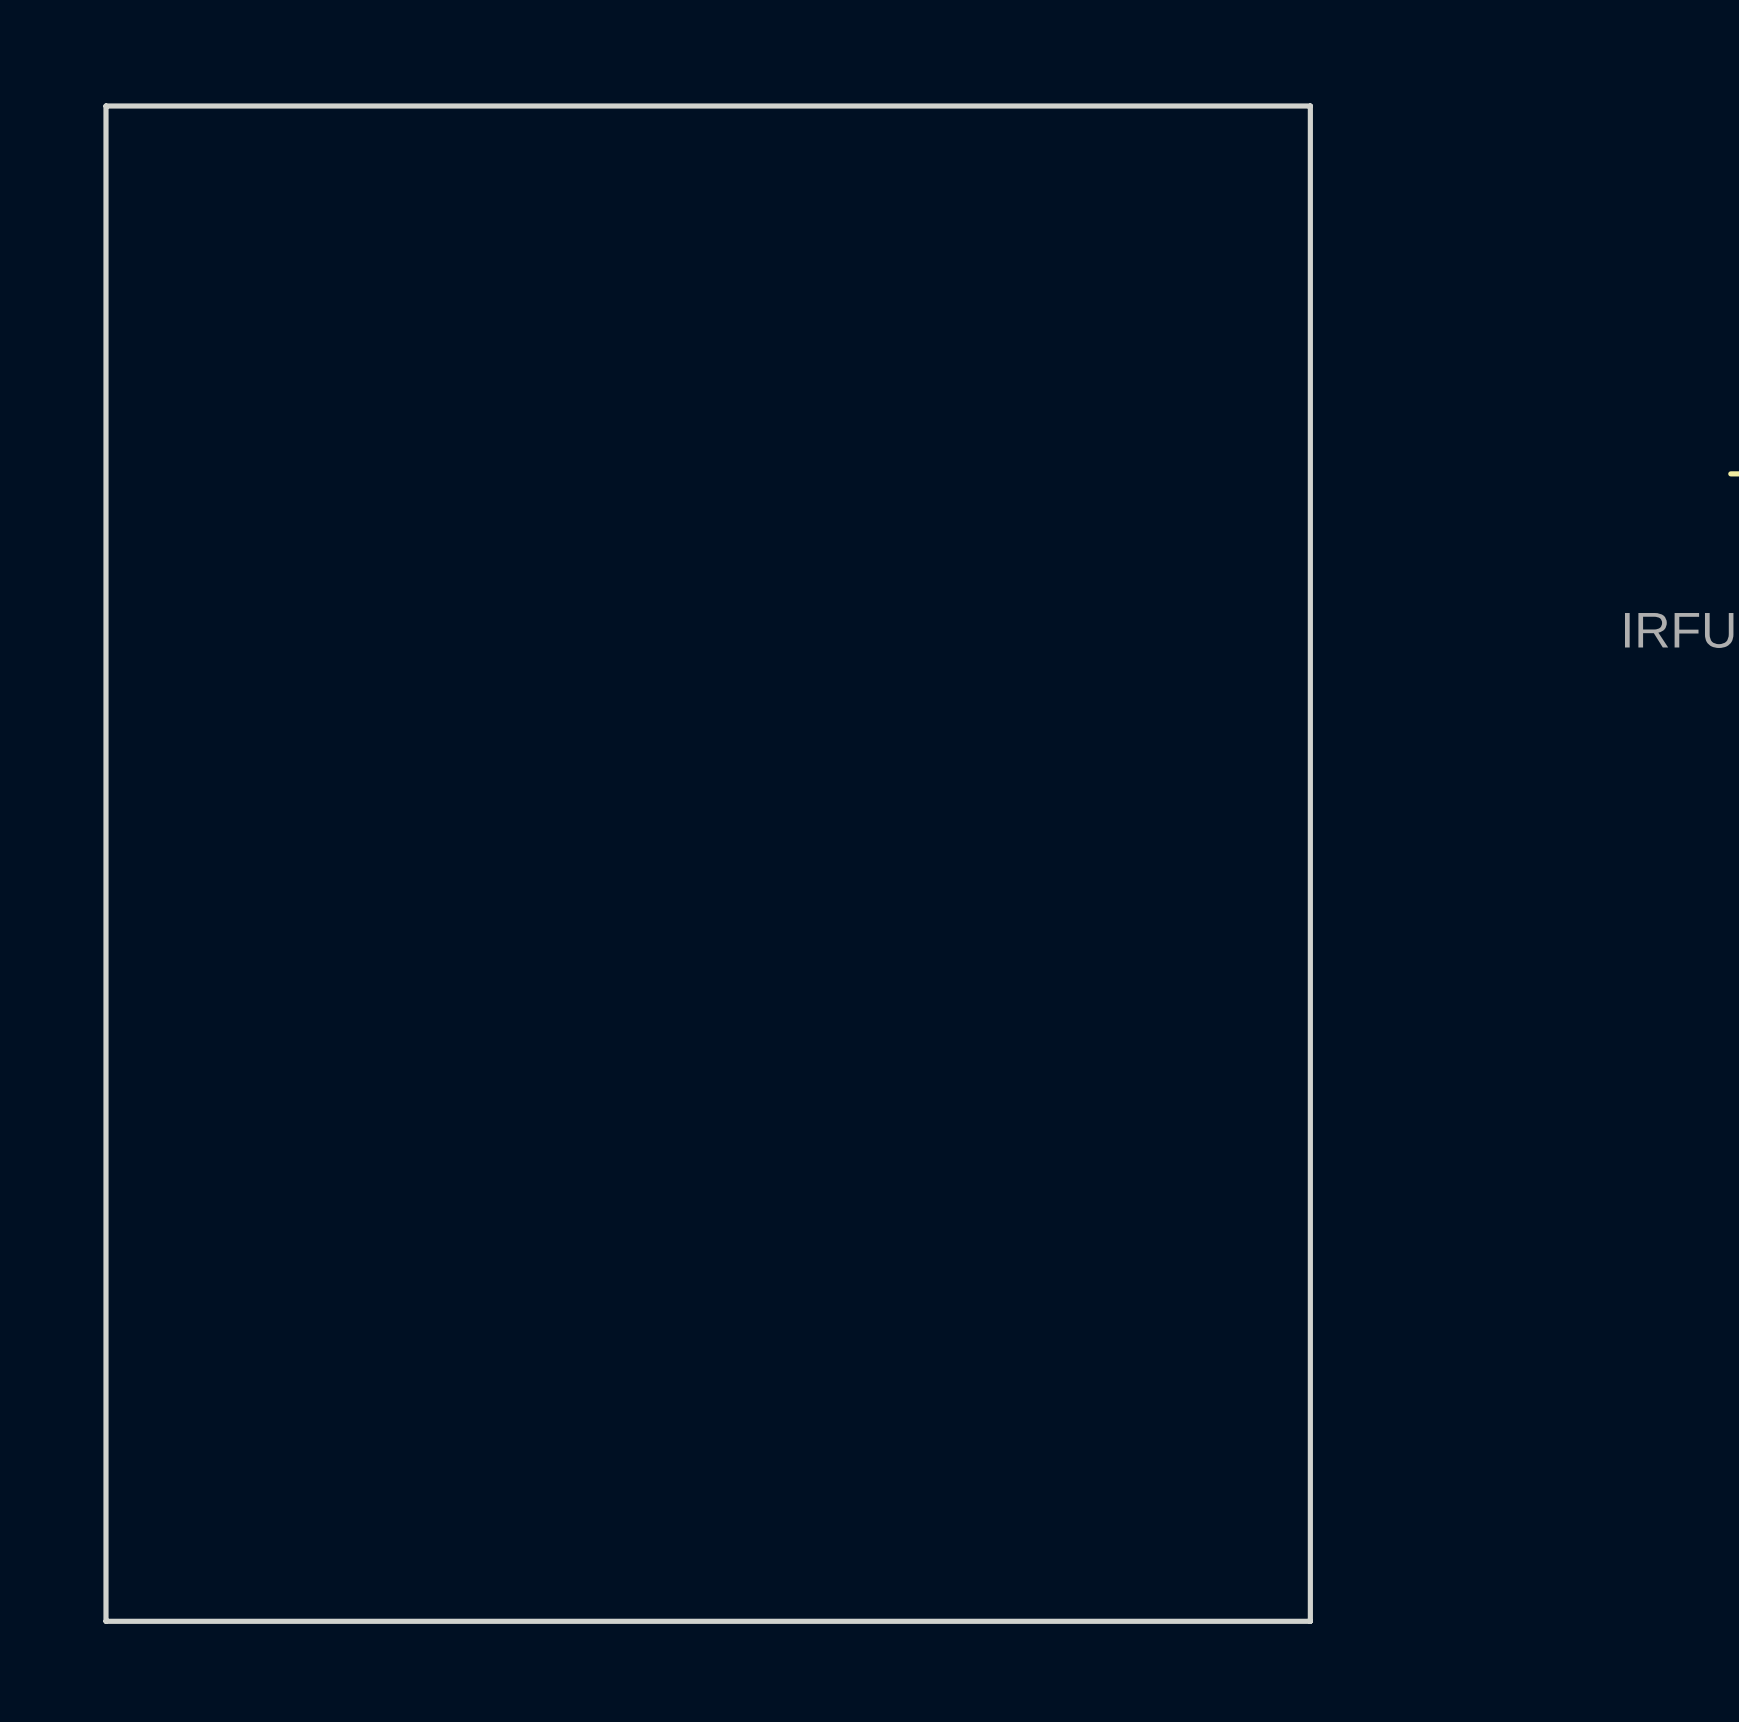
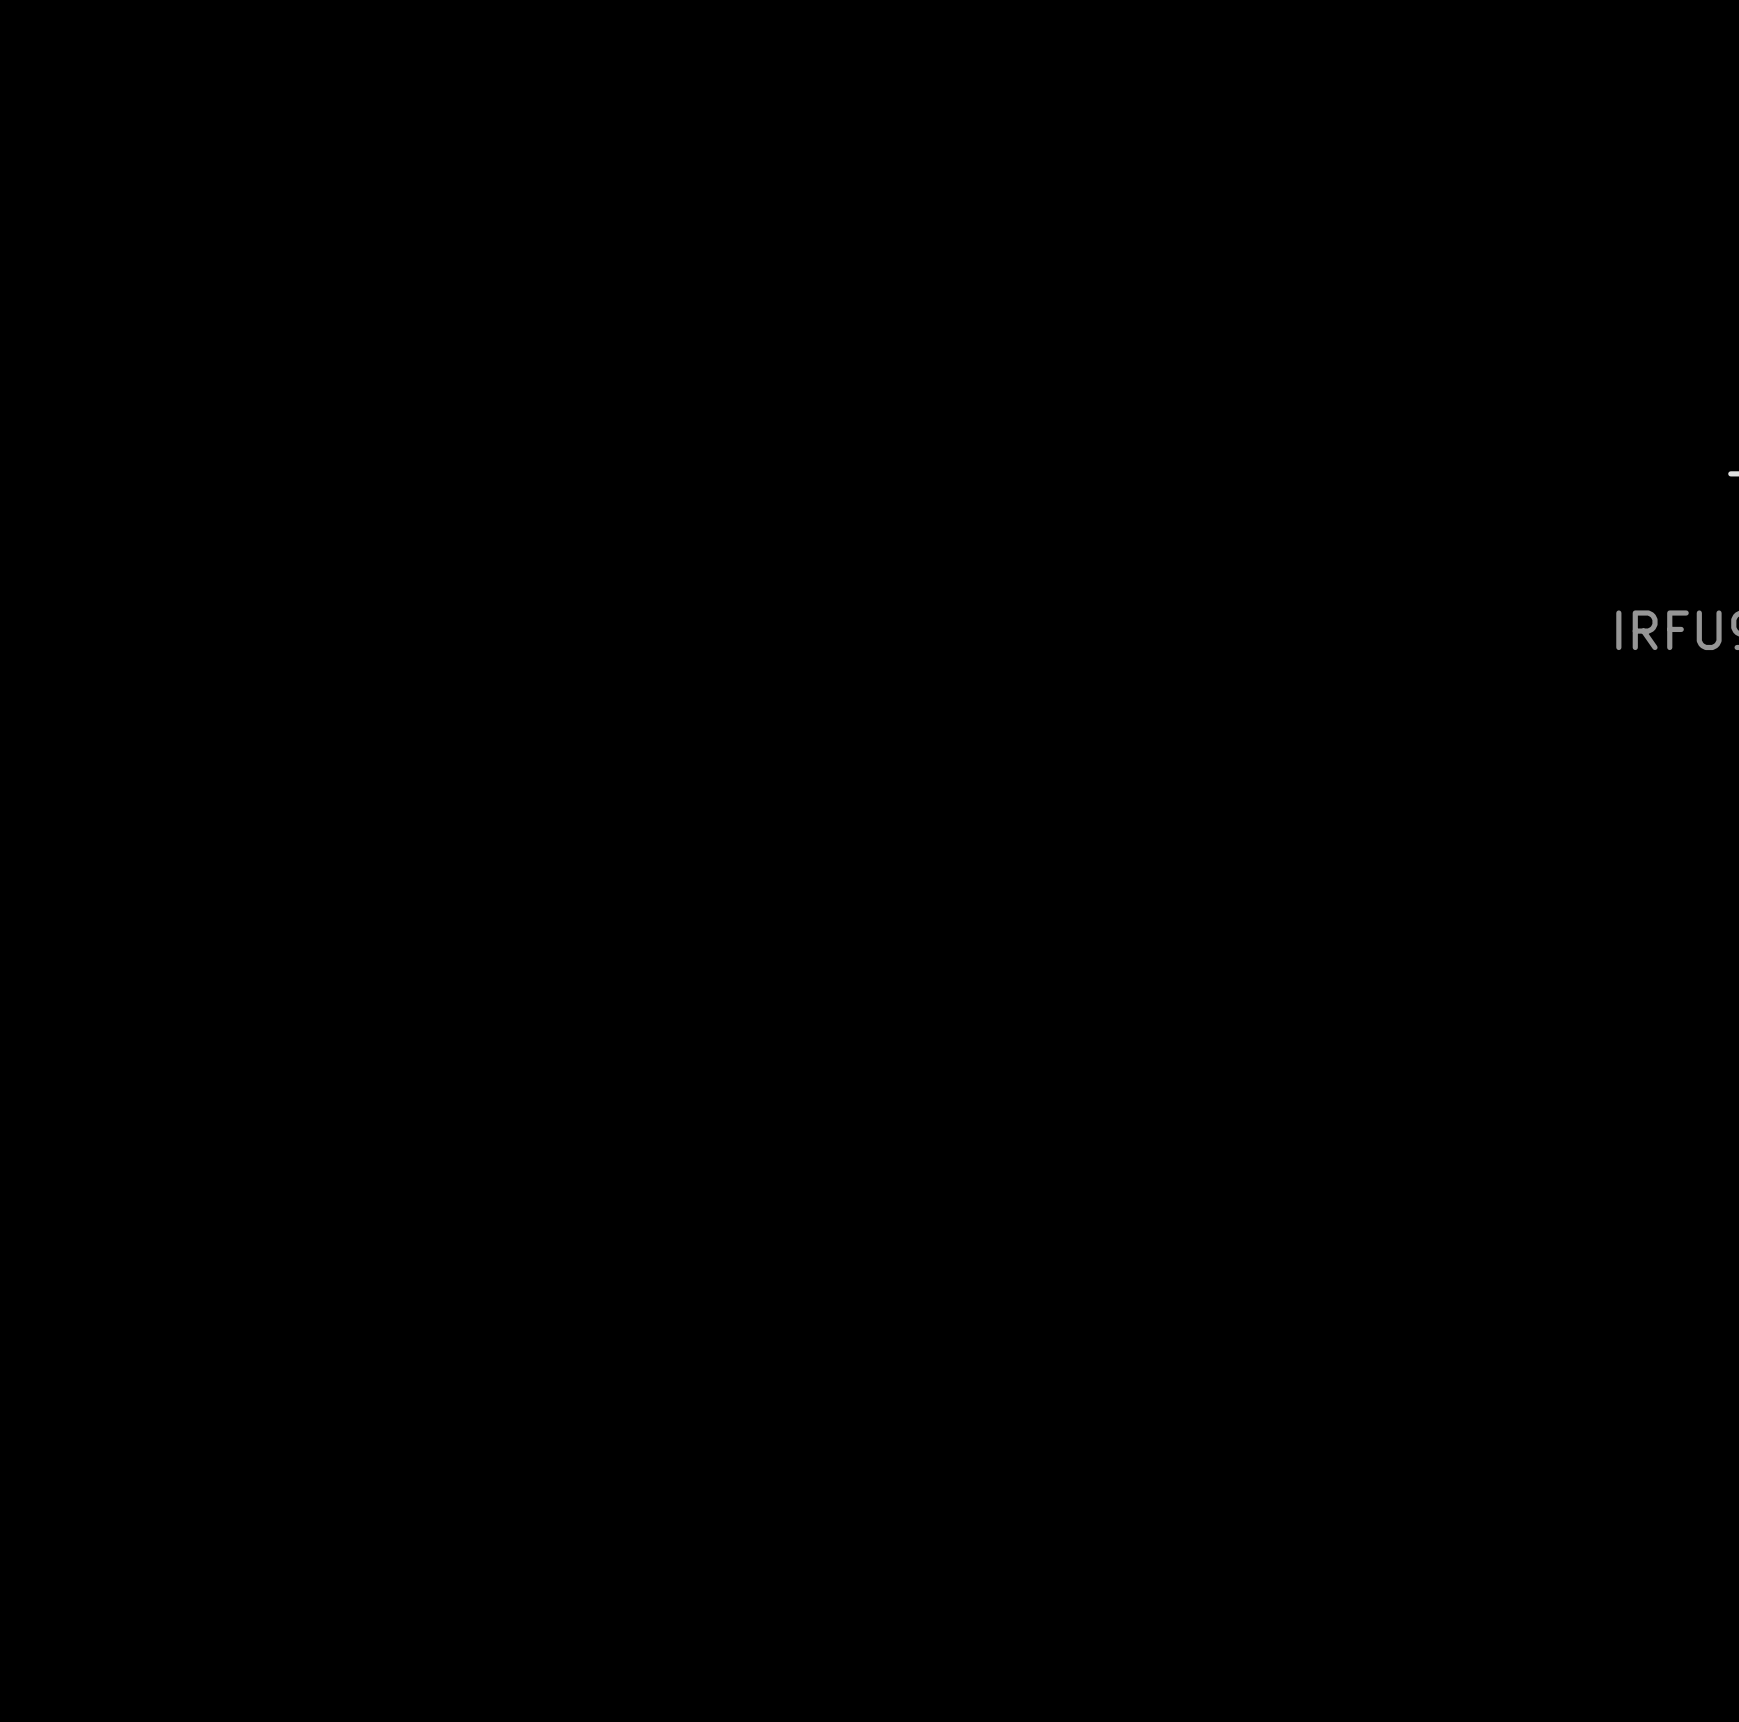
board edge: (105, 105) (105, 1621) (1310, 1621) (1310, 105) (105, 105) -> none

